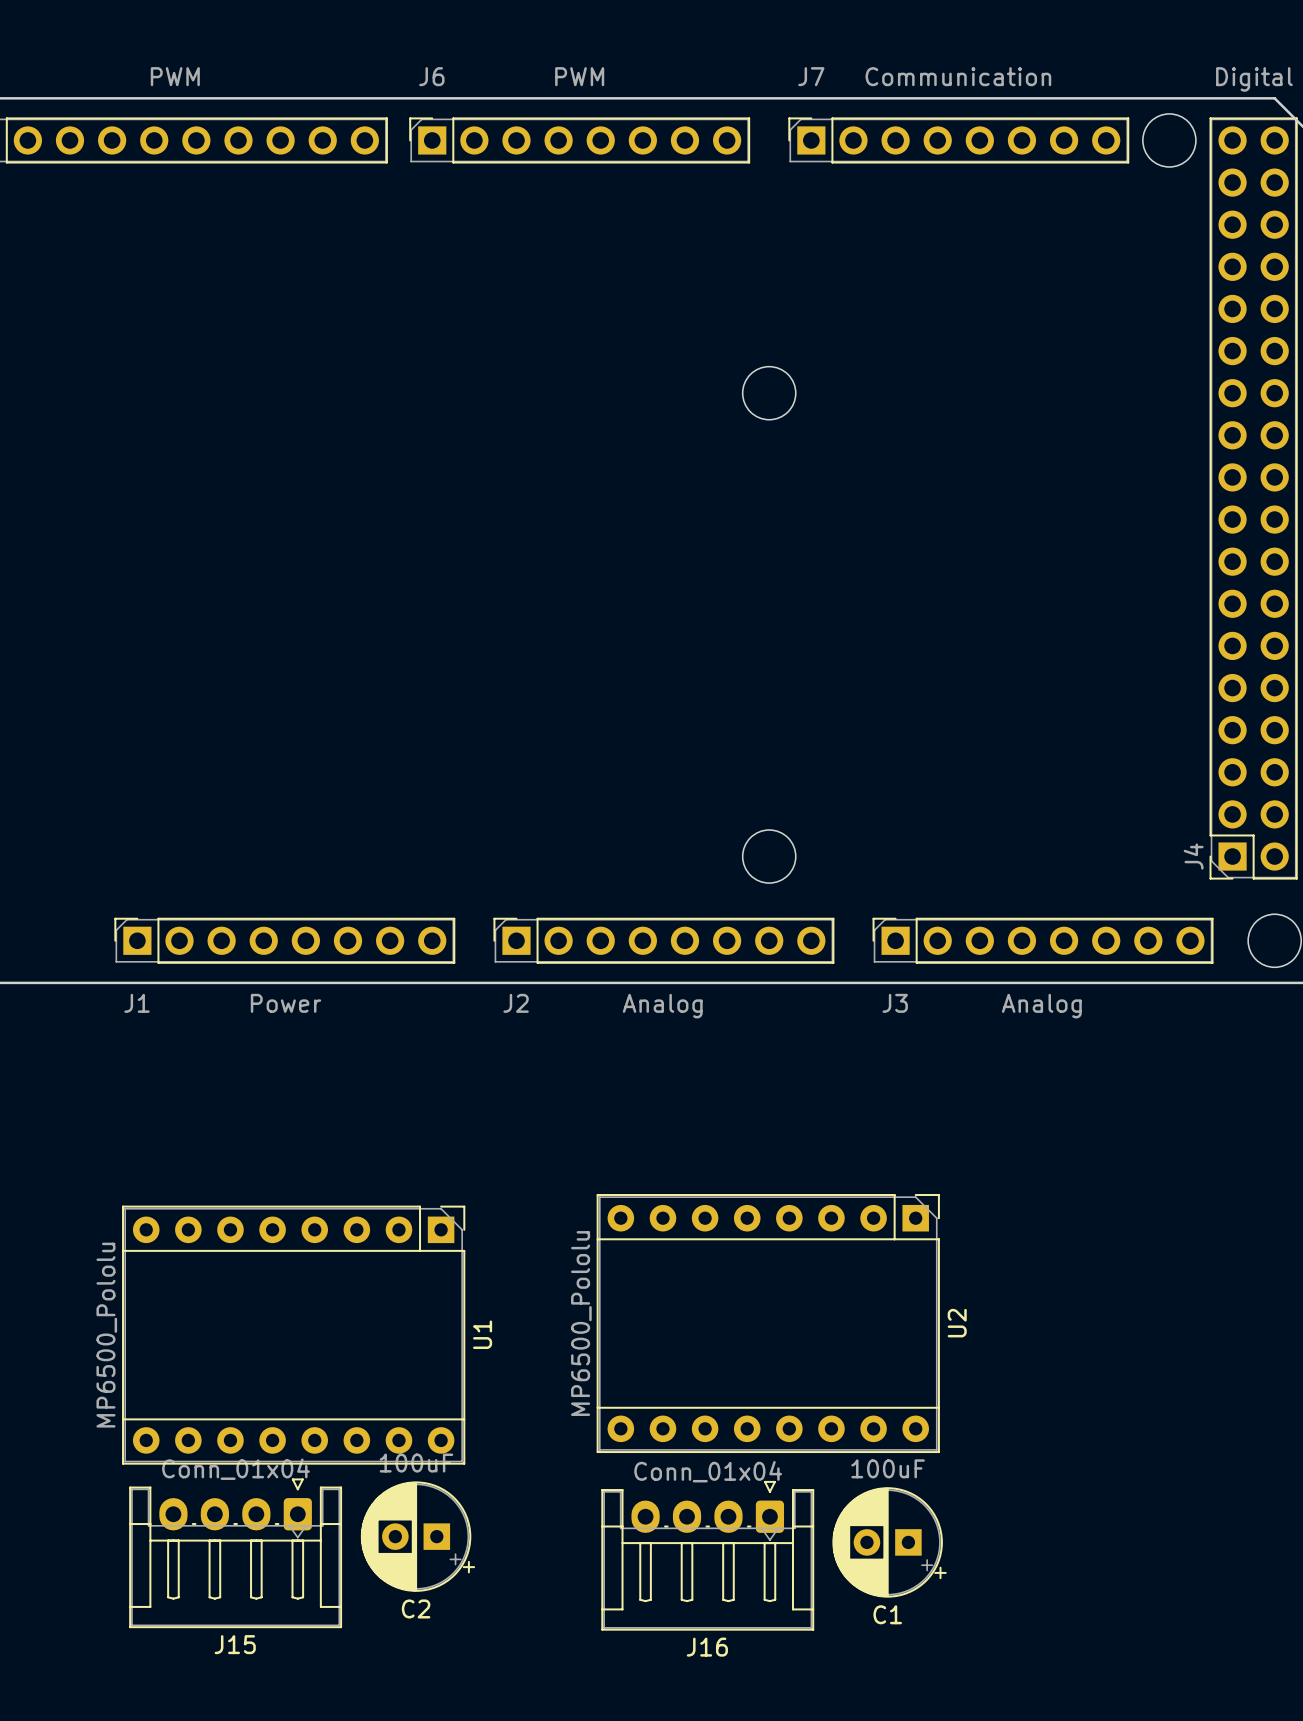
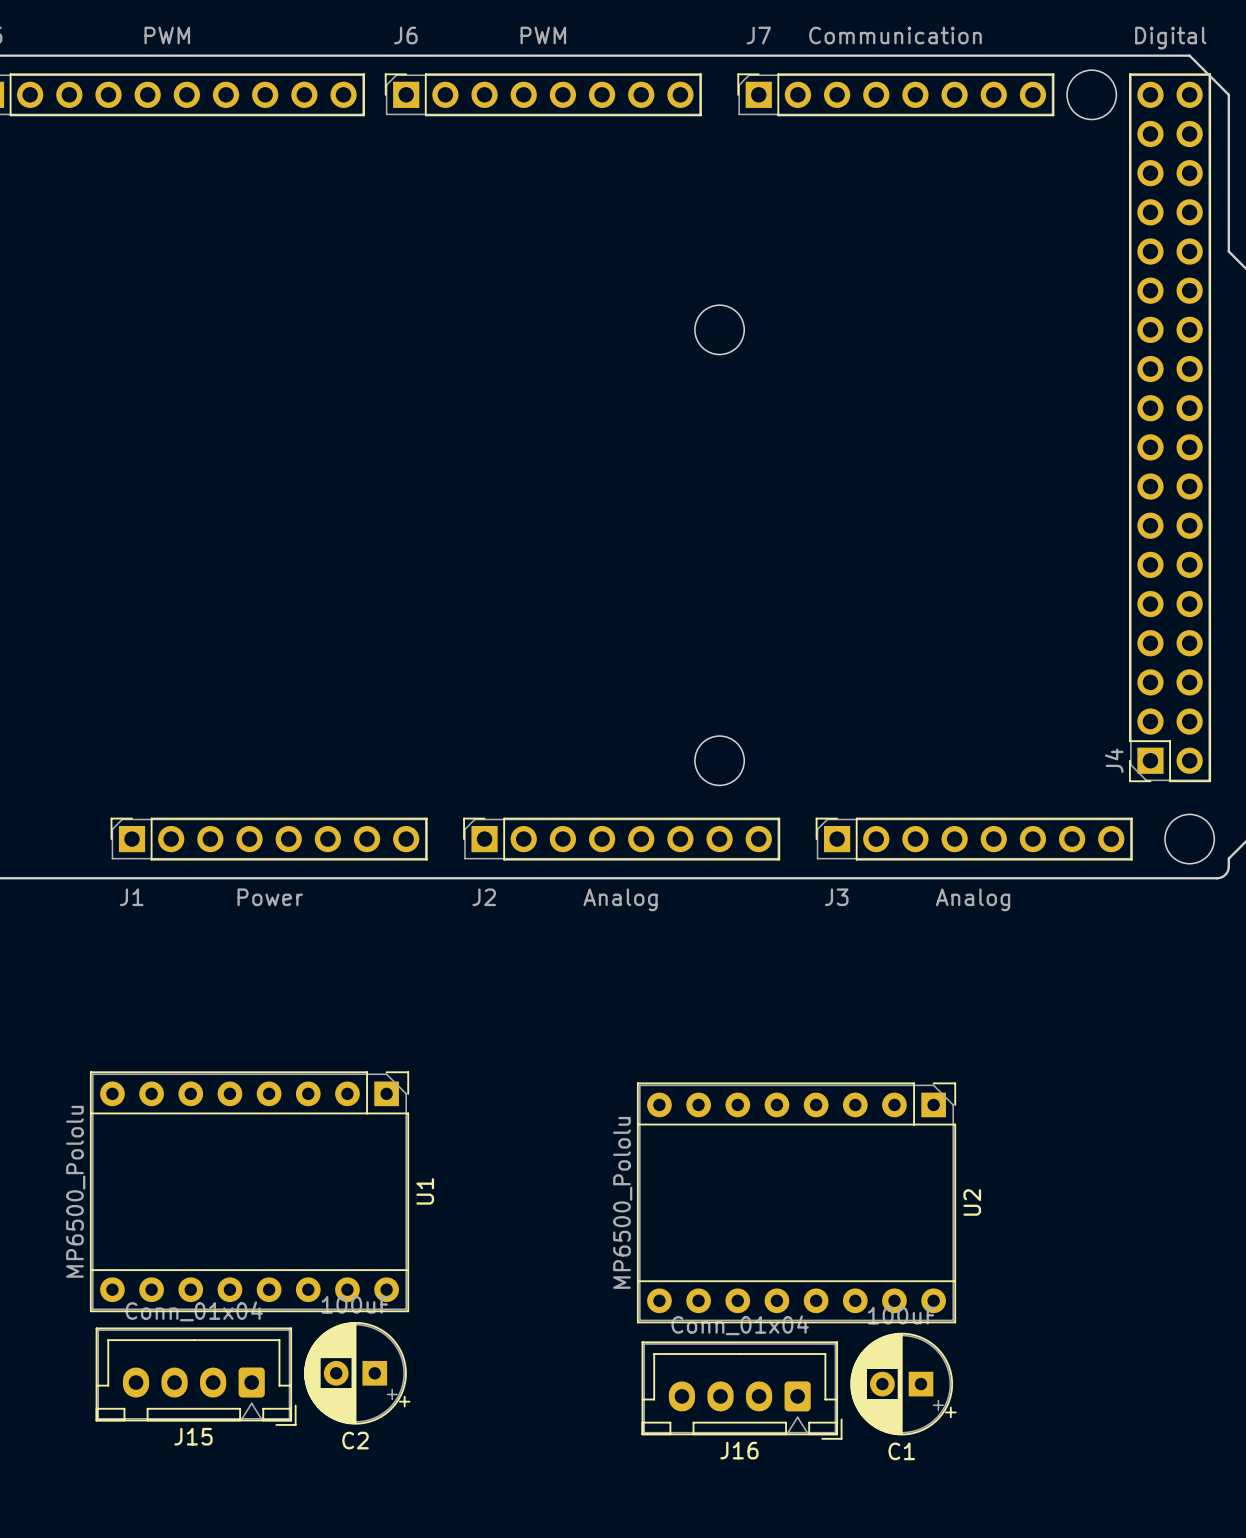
U2 position: (768, 1323) -> (796, 1202)
U1 position: (293, 1335) -> (249, 1191)
J15 footprint: [129, 1478, 343, 1629] -> [95, 1327, 297, 1426]
J16 footprint: [601, 1480, 815, 1631] -> [641, 1341, 843, 1440]
C2 position: (417, 1536) -> (357, 1373)
C1 position: (889, 1542) -> (903, 1384)

